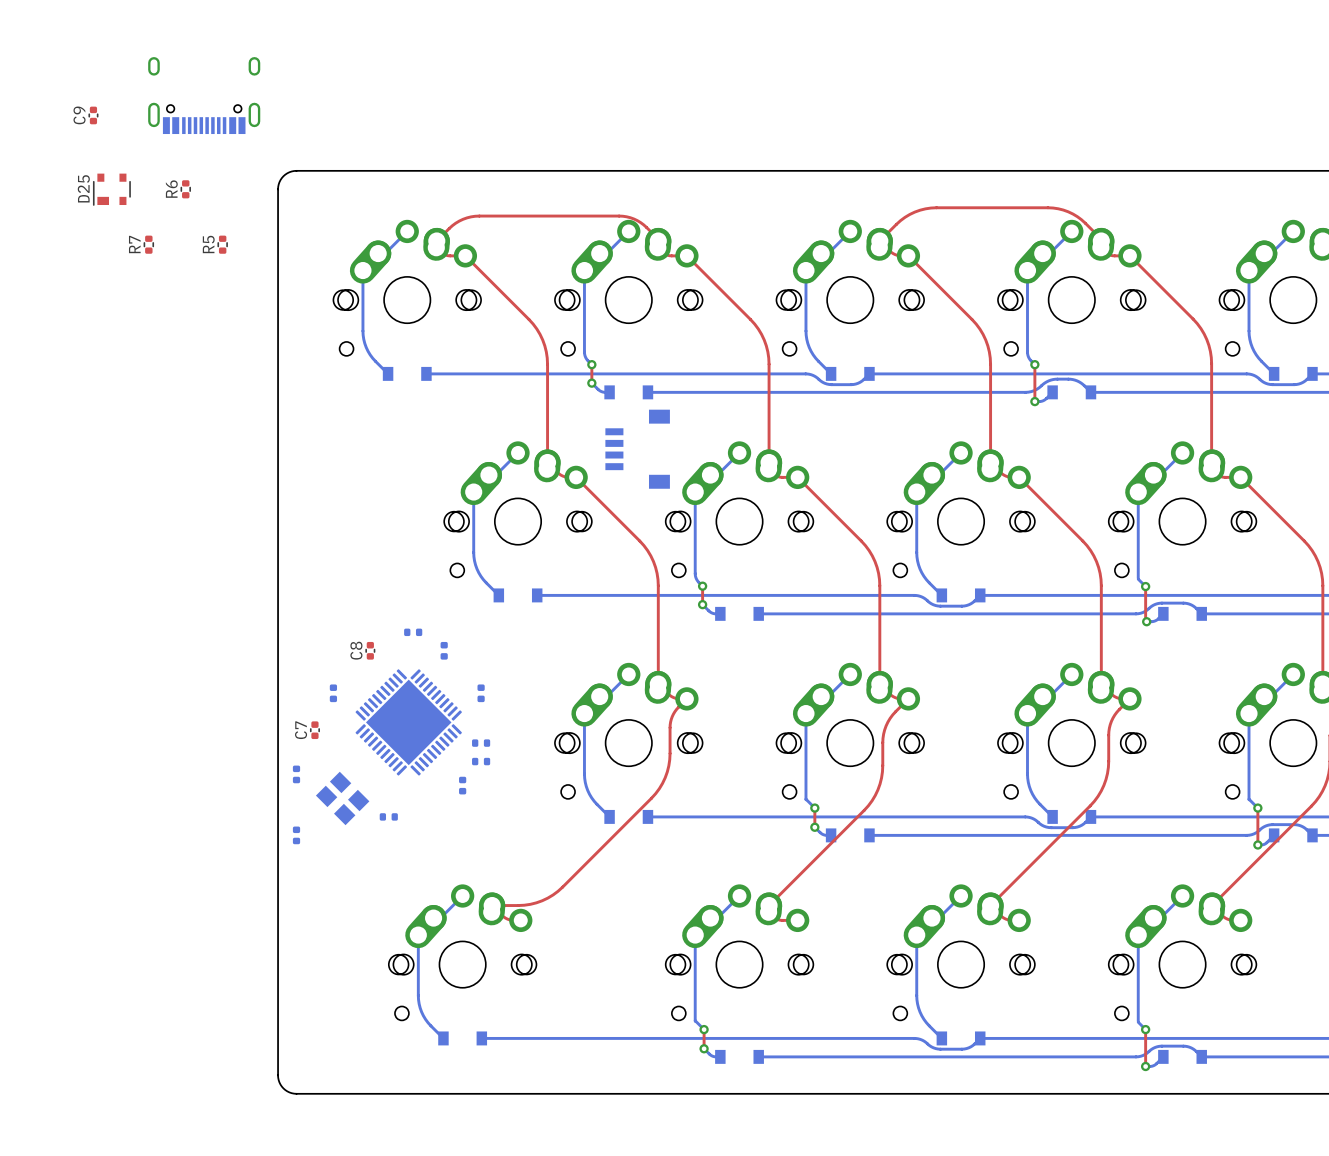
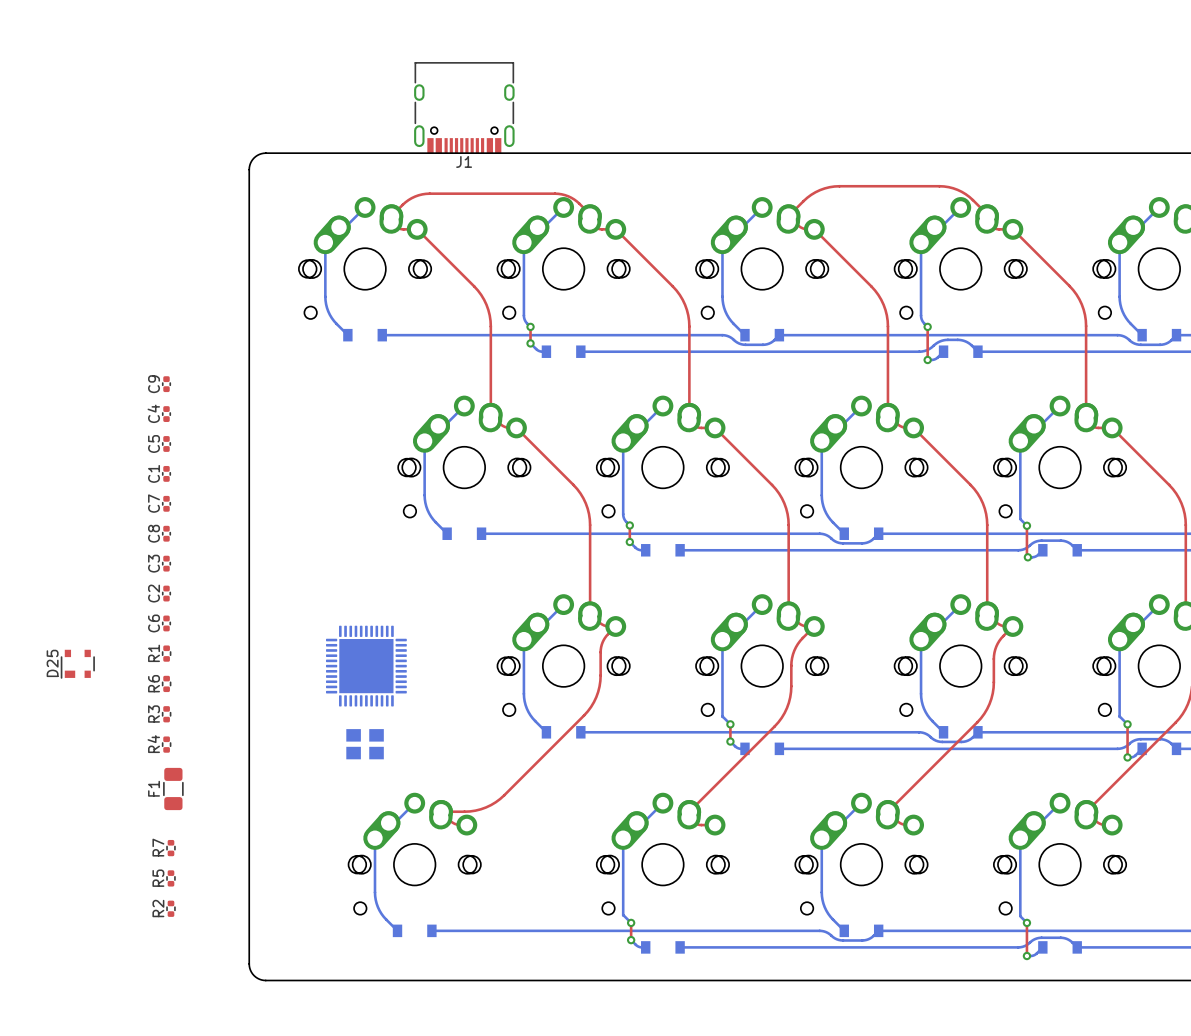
part: (204, 95) -> none
C9 position: (93, 115) -> (166, 384)
J1: none -> (464, 107)
D25 position: (111, 189) -> (77, 664)
R6 position: (185, 189) -> (166, 683)
R7 position: (148, 244) -> (170, 848)
R5 position: (222, 244) -> (170, 878)
part: (637, 449) -> none
C4: none -> (166, 414)
C5: none -> (166, 443)
C1: none -> (166, 473)
part: (413, 632) -> none
C8 position: (370, 650) -> (166, 533)
part: (444, 650) -> none
C2 side: bottom (333, 693) -> top (166, 593)
part: (481, 693) -> none
C6: none -> (166, 623)
part: (408, 722) -> none
R1: none -> (166, 653)
C7 position: (314, 730) -> (166, 503)
part: none -> (366, 666)
part: (481, 743) -> none
part: (481, 761) -> none
C3 side: bottom (296, 774) -> top (166, 563)
part: (462, 785) -> none
part: (342, 798) -> none
R3 side: bottom (388, 816) -> top (166, 714)
R4: none -> (166, 744)
part: none -> (365, 744)
part: (296, 835) -> none
F1: none -> (173, 788)
R2: none -> (170, 908)

